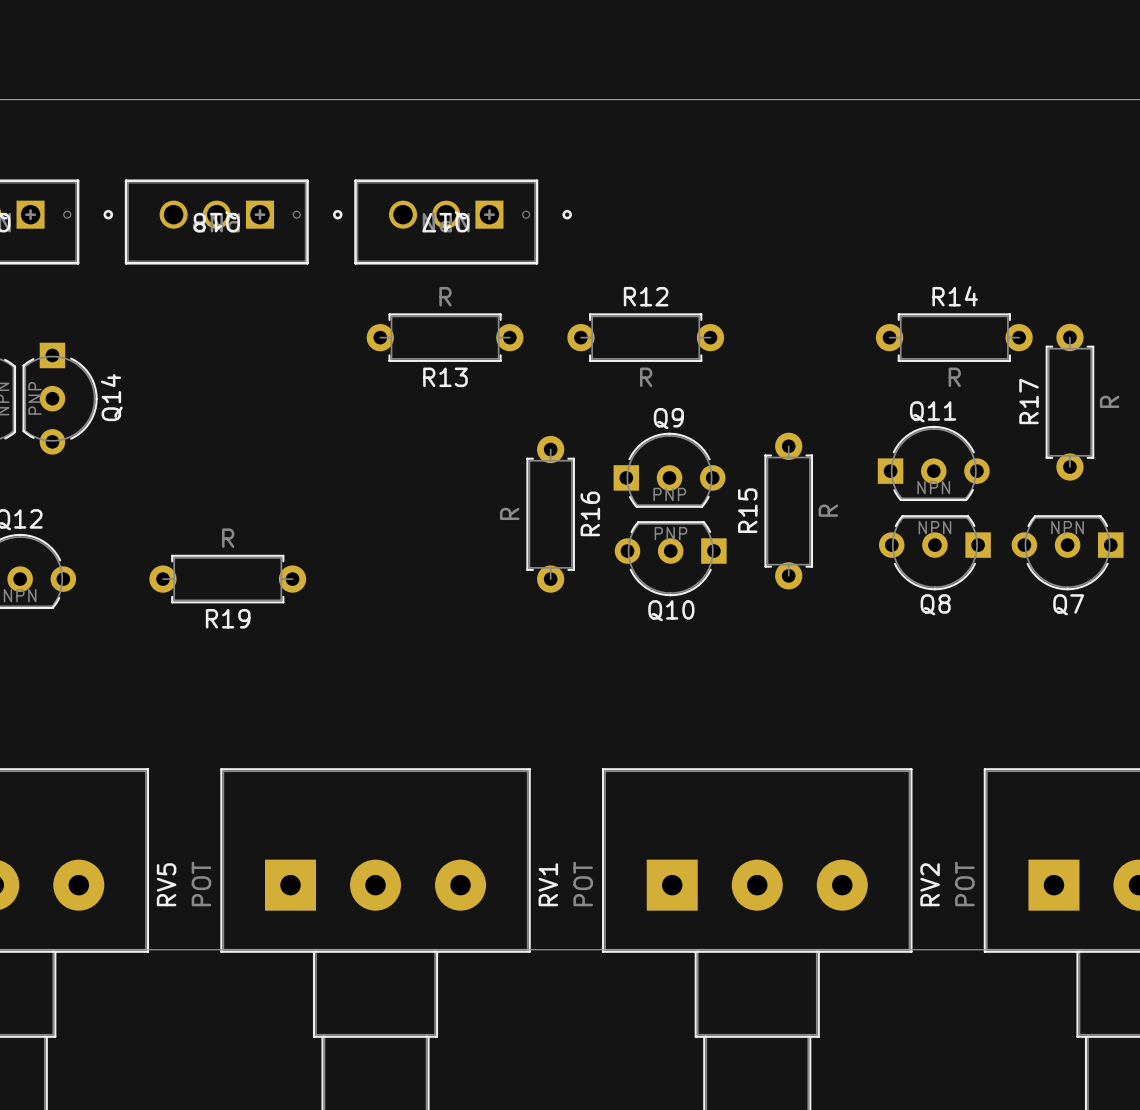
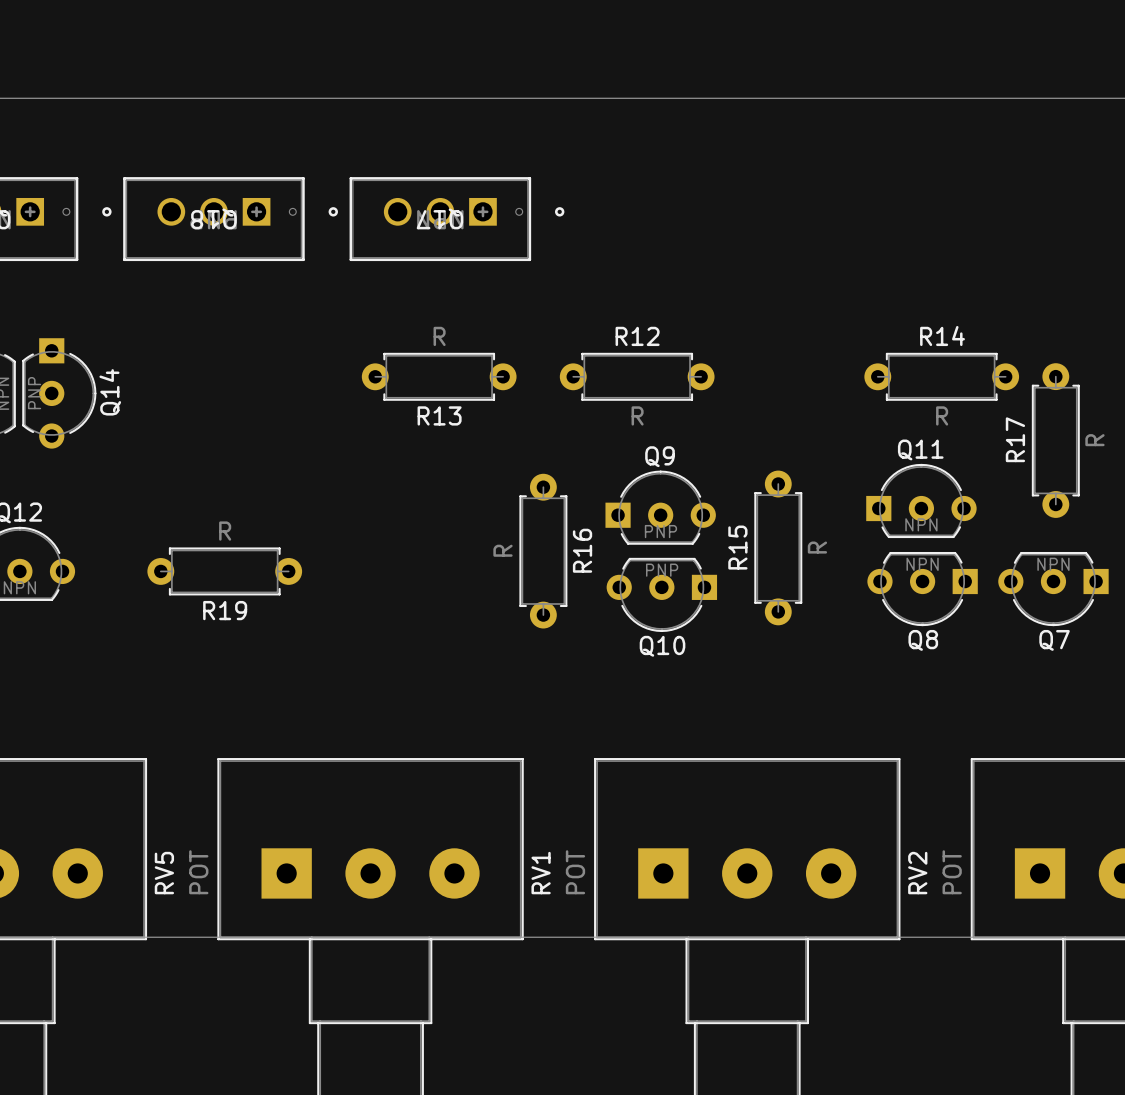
R13 position: (445, 337) -> (439, 376)
R12 position: (645, 337) -> (637, 376)
R14 position: (954, 337) -> (941, 376)
R17 position: (1069, 402) -> (1055, 440)
Q11 position: (933, 463) -> (921, 500)
Q9 position: (669, 470) -> (660, 507)
R15 position: (788, 511) -> (778, 547)
R16 position: (550, 514) -> (543, 551)
Q8 position: (934, 552) -> (922, 589)
Q7 position: (1067, 552) -> (1053, 589)
Q10 position: (670, 558) -> (661, 594)

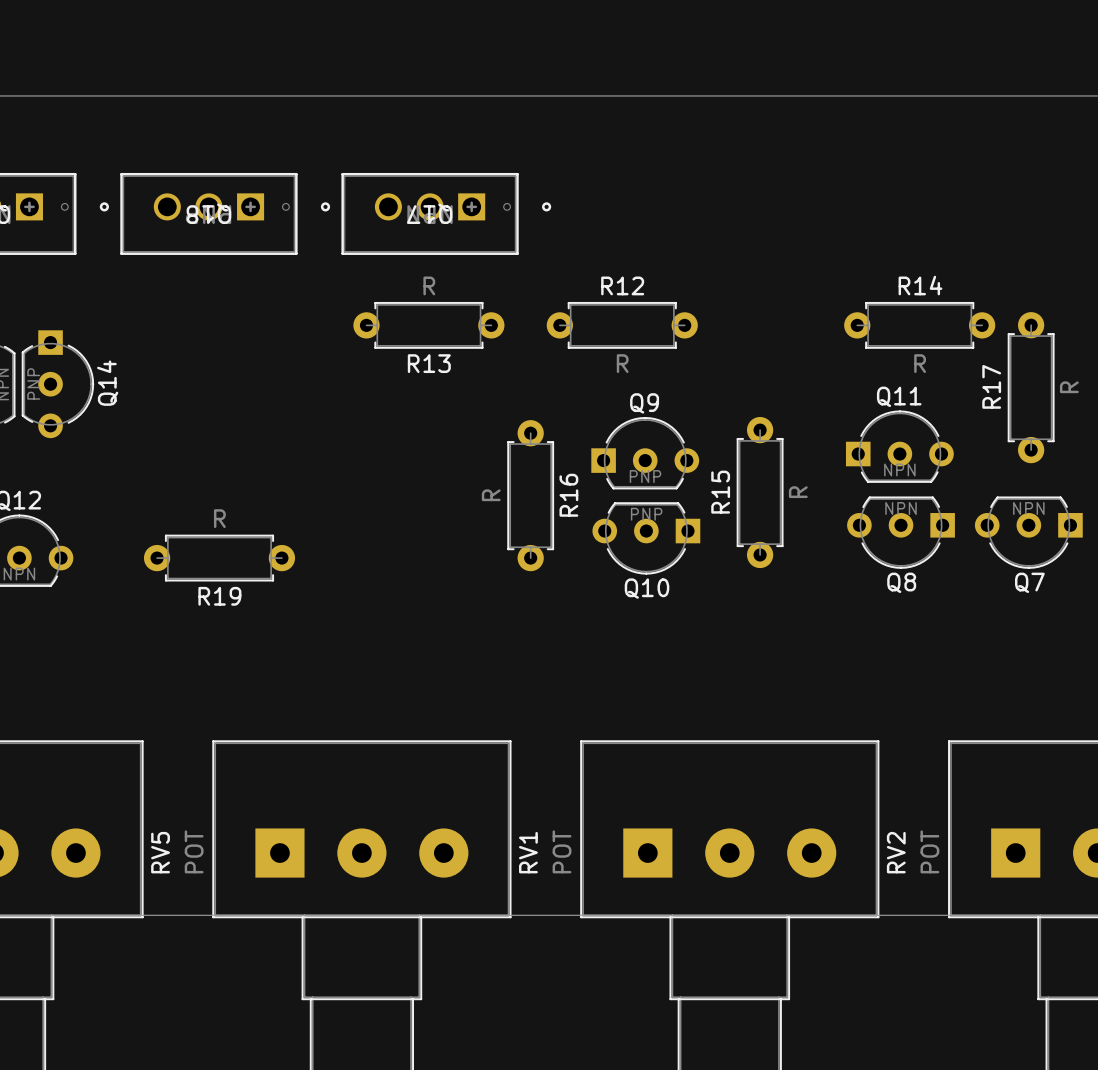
R13 position: (439, 376) -> (428, 325)
R12 position: (637, 376) -> (622, 325)
R14 position: (941, 376) -> (919, 325)
R17 position: (1055, 440) -> (1031, 387)
Q11 position: (921, 500) -> (899, 446)
Q9 position: (660, 507) -> (645, 453)
R15 position: (778, 547) -> (760, 492)
R16 position: (543, 551) -> (530, 495)
Q8 position: (922, 589) -> (901, 532)
Q7 position: (1053, 589) -> (1028, 532)
Q10 position: (661, 594) -> (646, 538)

